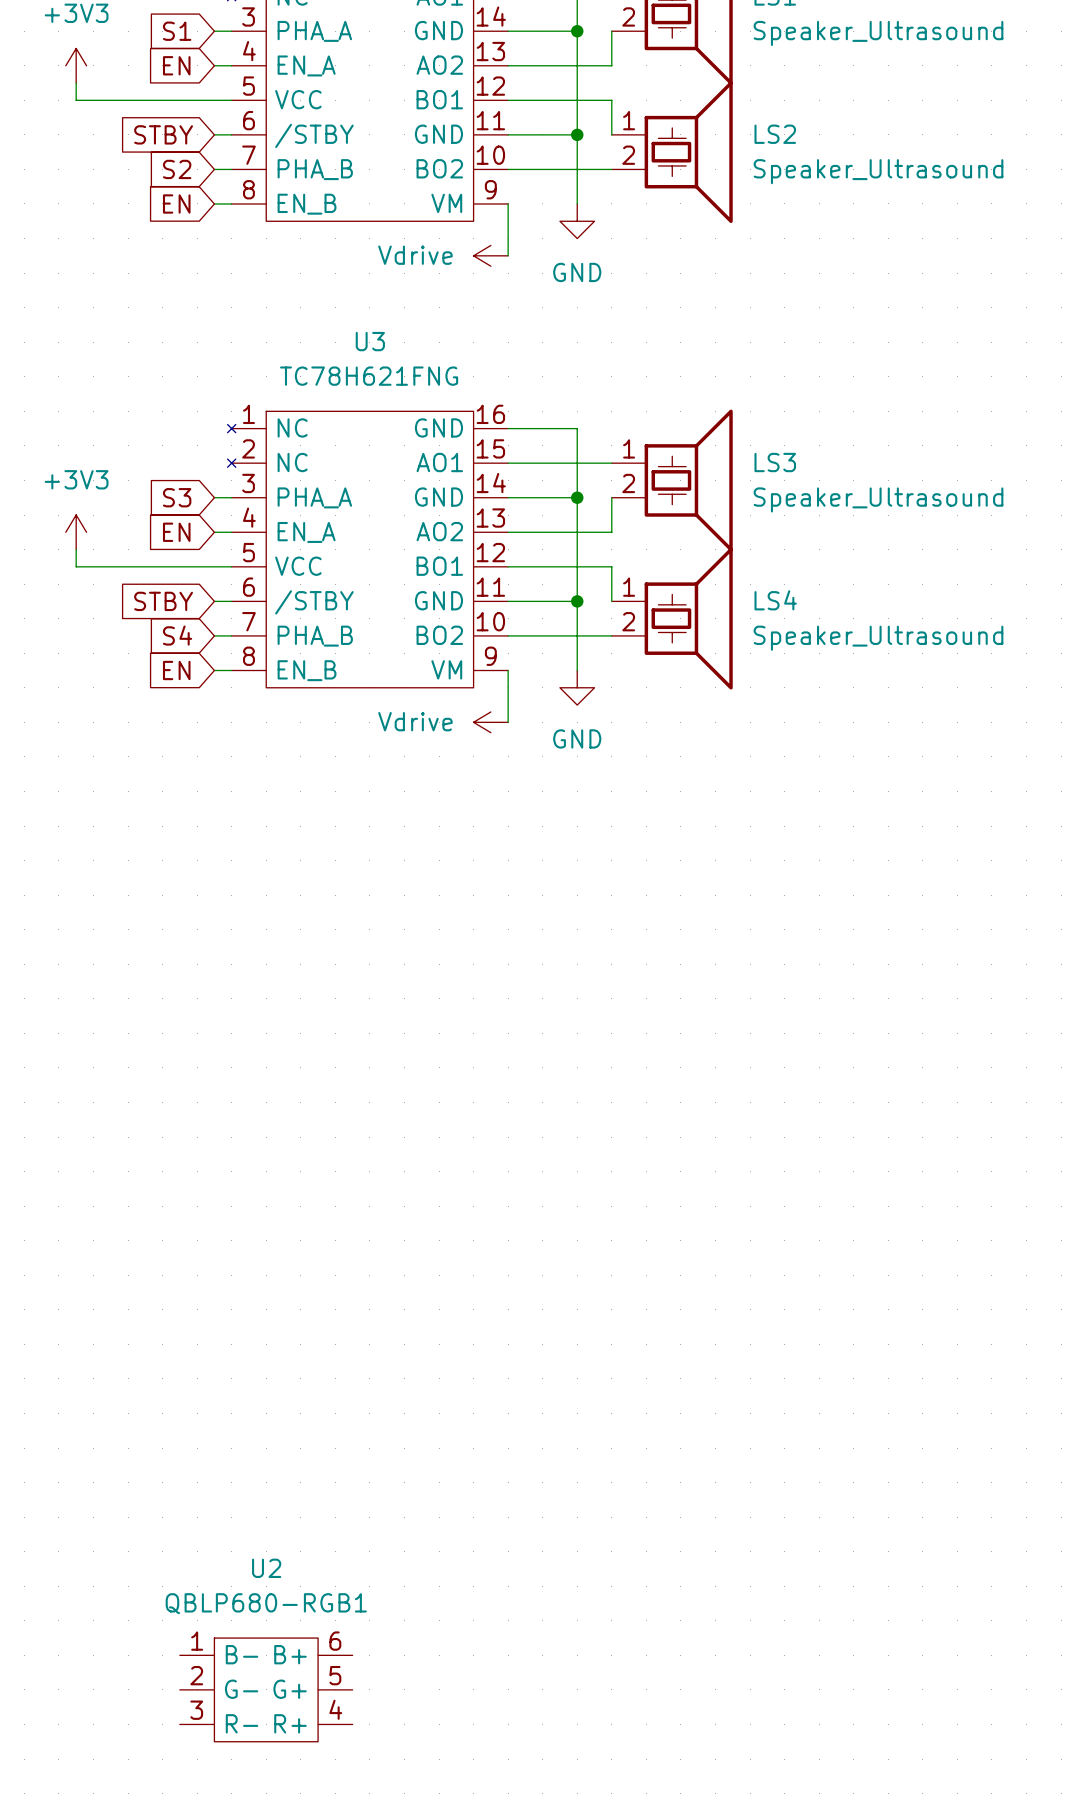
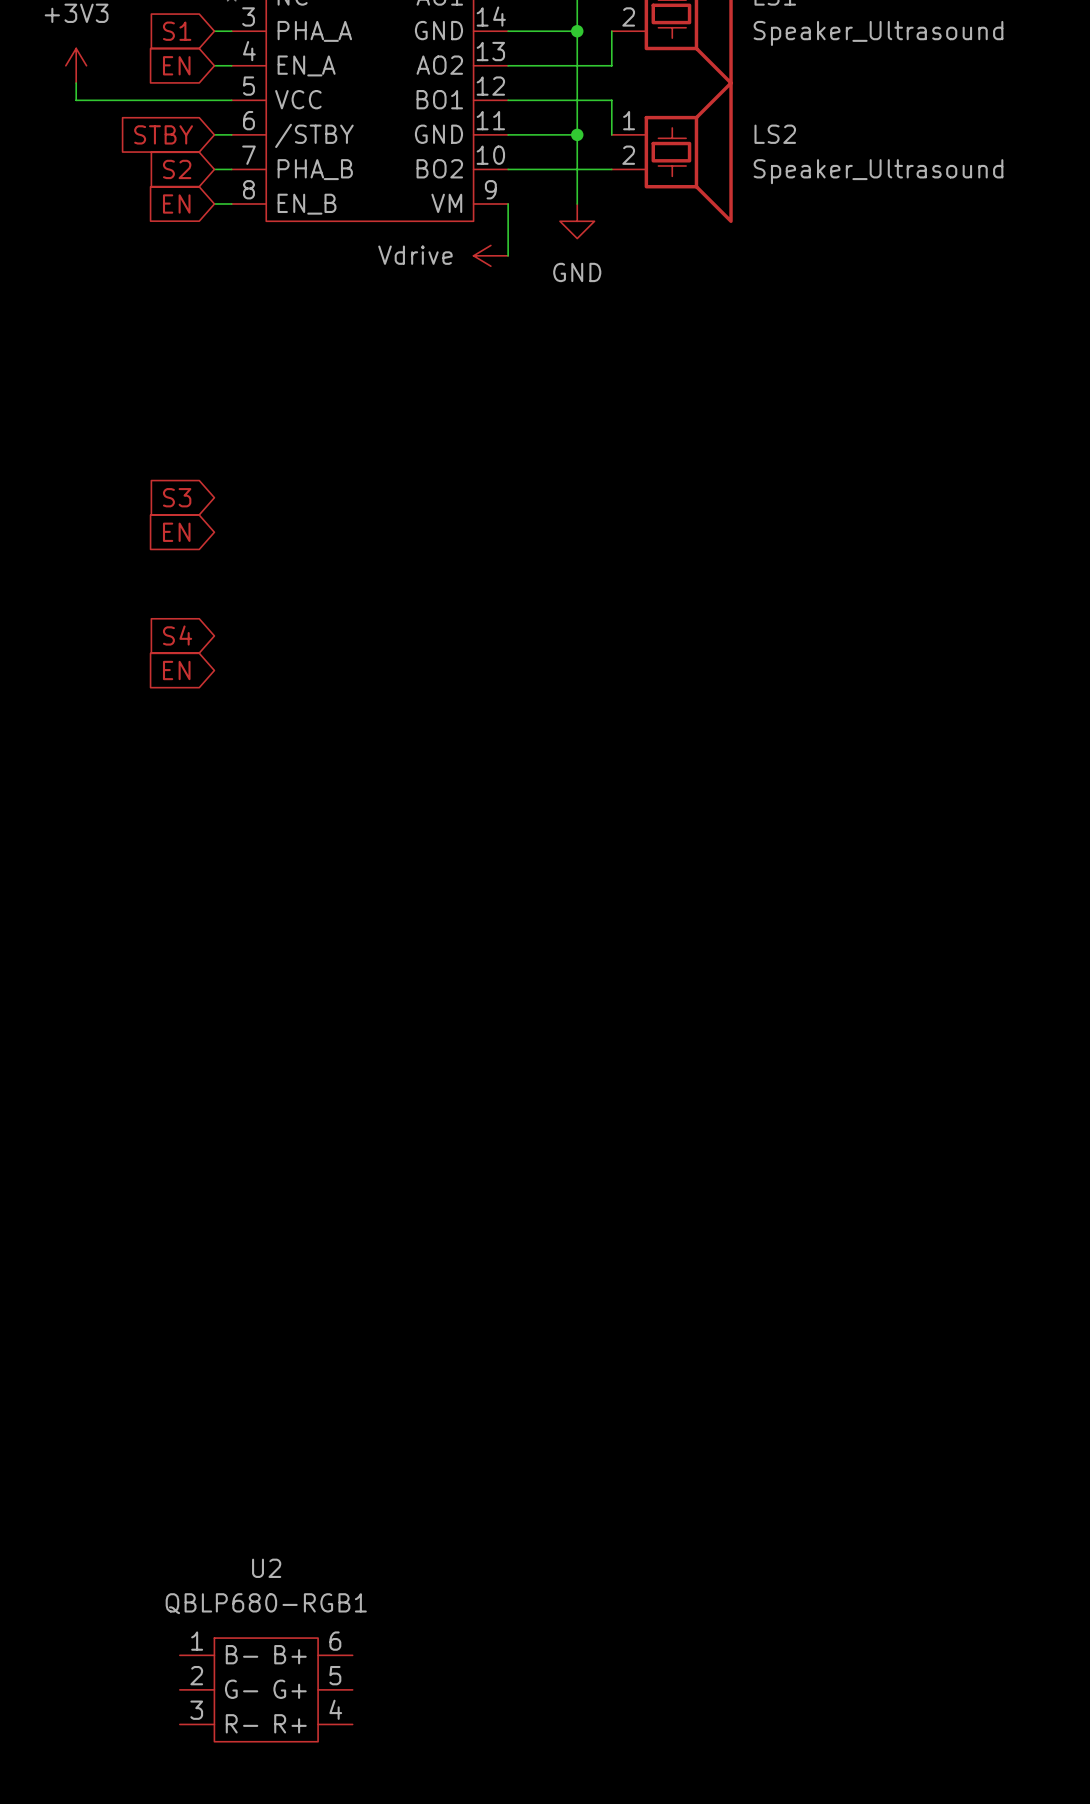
wire: (508, 428) (577, 428) (577, 670) -> none
wire: (508, 463) (611, 463) -> none
LS3: Speaker_Ultrasound (672, 480) -> none
wire: (214, 497) (231, 497) -> none
wire: (508, 497) (577, 497) -> none
junction: (577, 497) -> none
wire: (611, 497) (611, 532) (508, 532) -> none
power symbol: +3V3 (76, 532) -> none
wire: (214, 532) (231, 532) -> none
wire: (76, 549) (76, 566) (231, 566) -> none
U3: TC78H621FNG (367, 549) -> none
wire: (508, 566) (611, 566) (611, 601) -> none
global label: STBY (163, 601) -> none
wire: (214, 601) (231, 601) -> none
wire: (508, 601) (577, 601) -> none
junction: (577, 601) -> none
LS4: Speaker_Ultrasound (672, 618) -> none
wire: (214, 635) (231, 635) -> none
wire: (508, 635) (611, 635) -> none
wire: (214, 670) (231, 670) -> none
wire: (508, 670) (508, 722) -> none
power symbol: GND (577, 687) -> none
power symbol: Vdrive (490, 722) -> none

